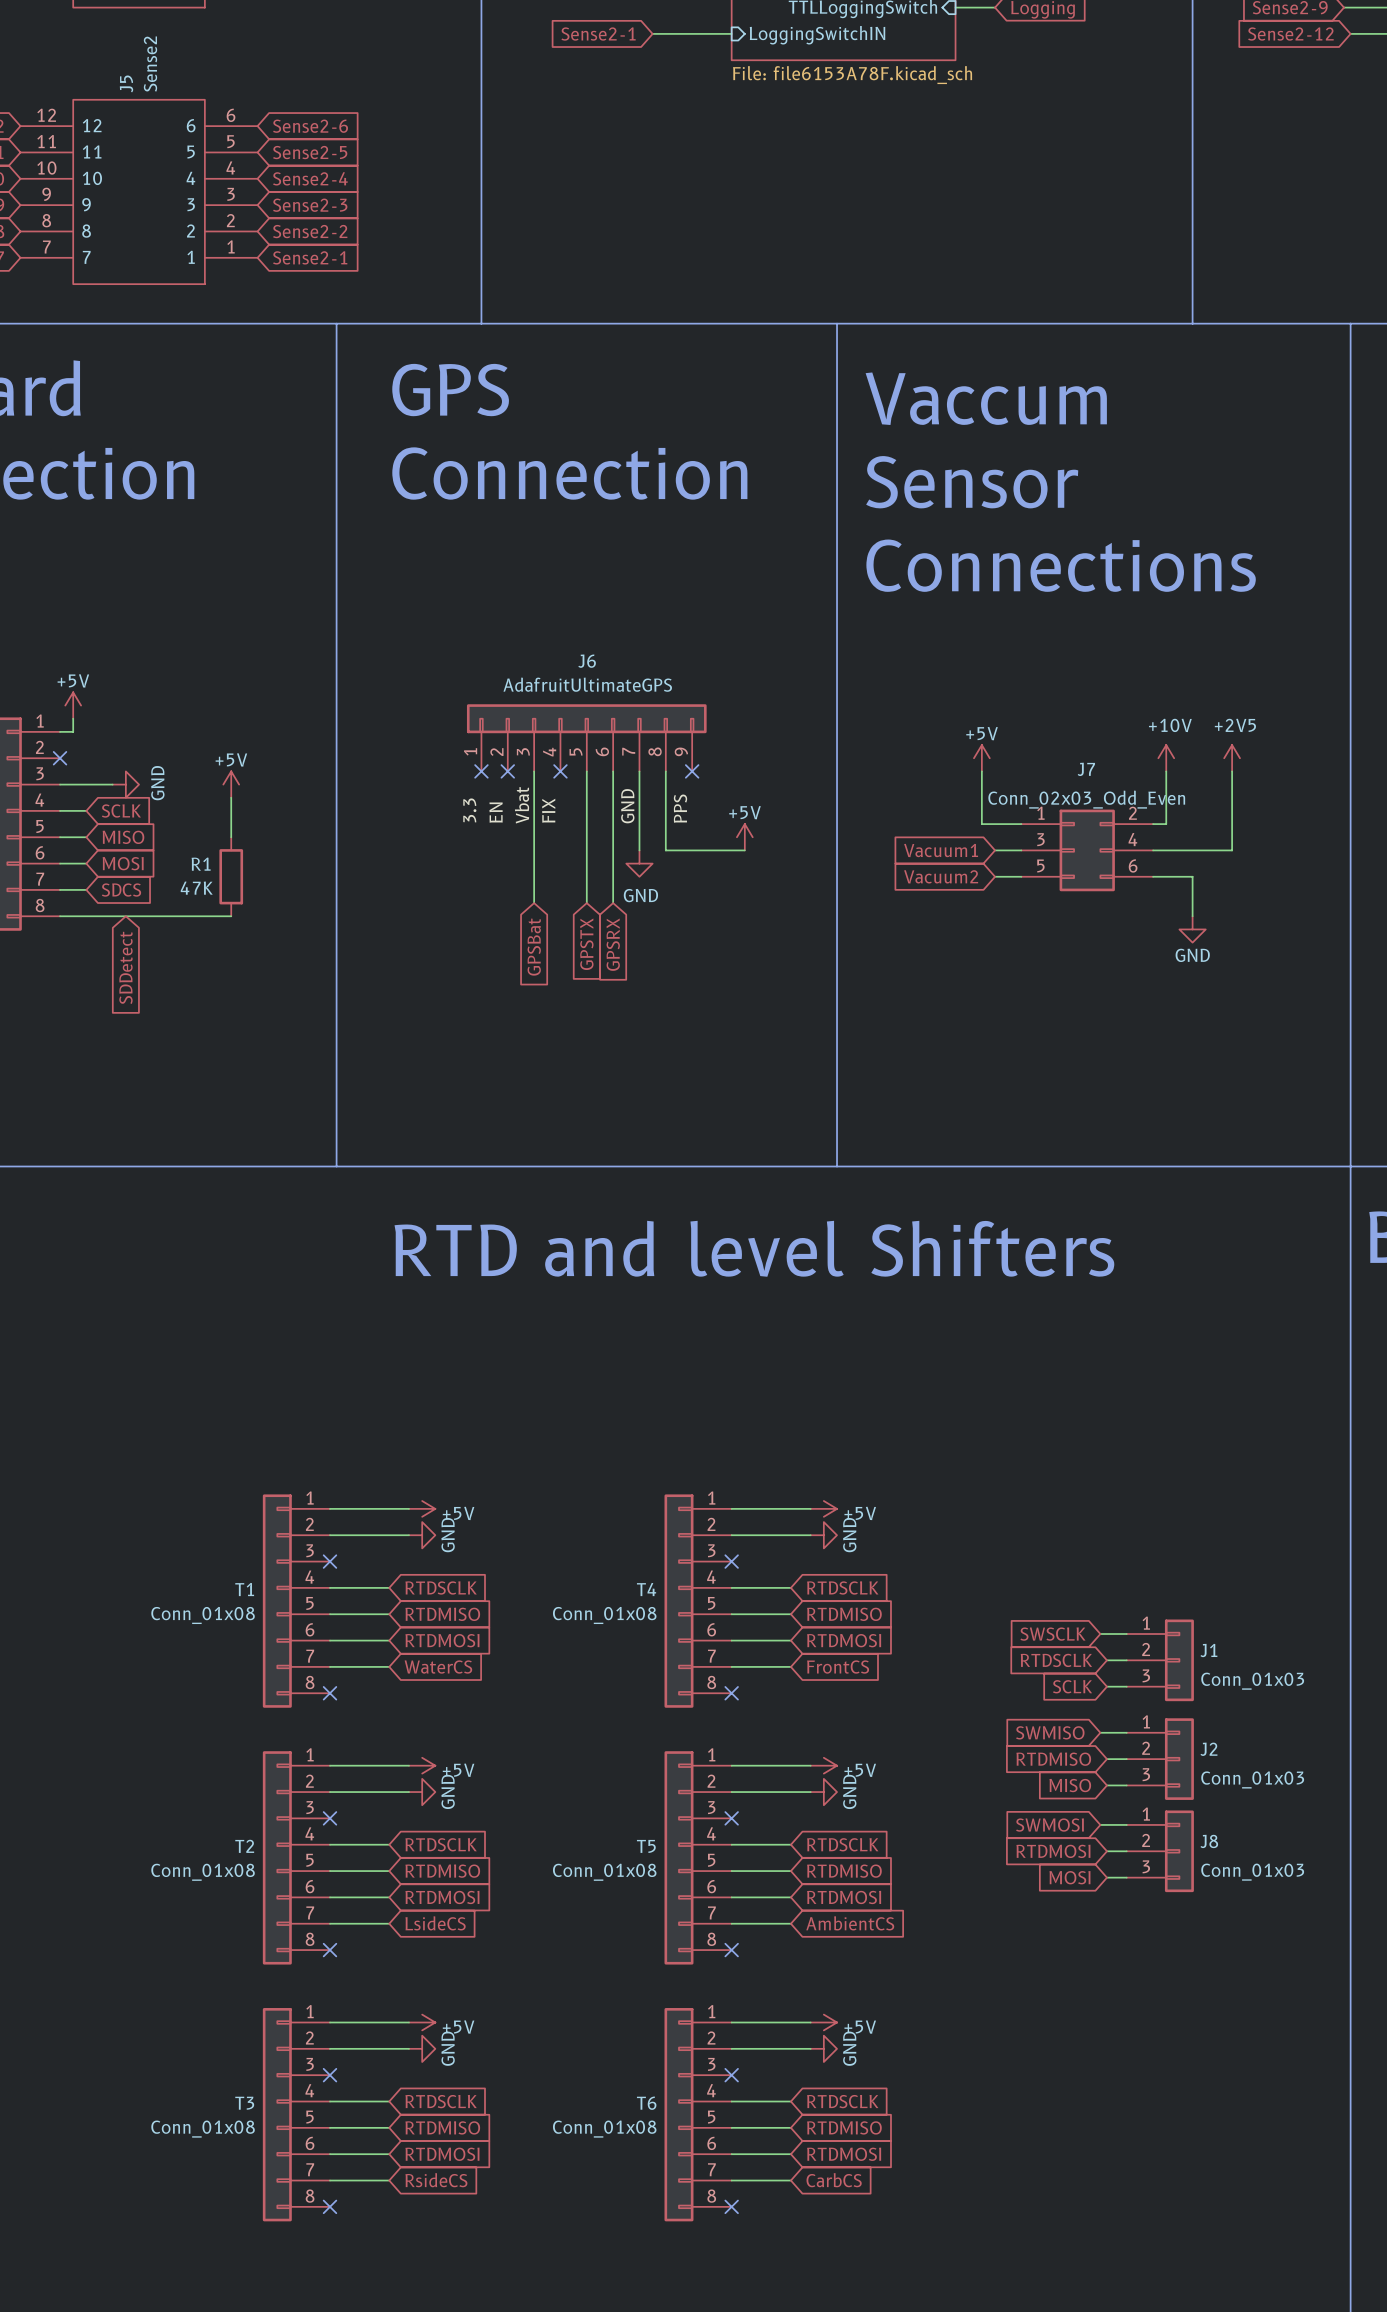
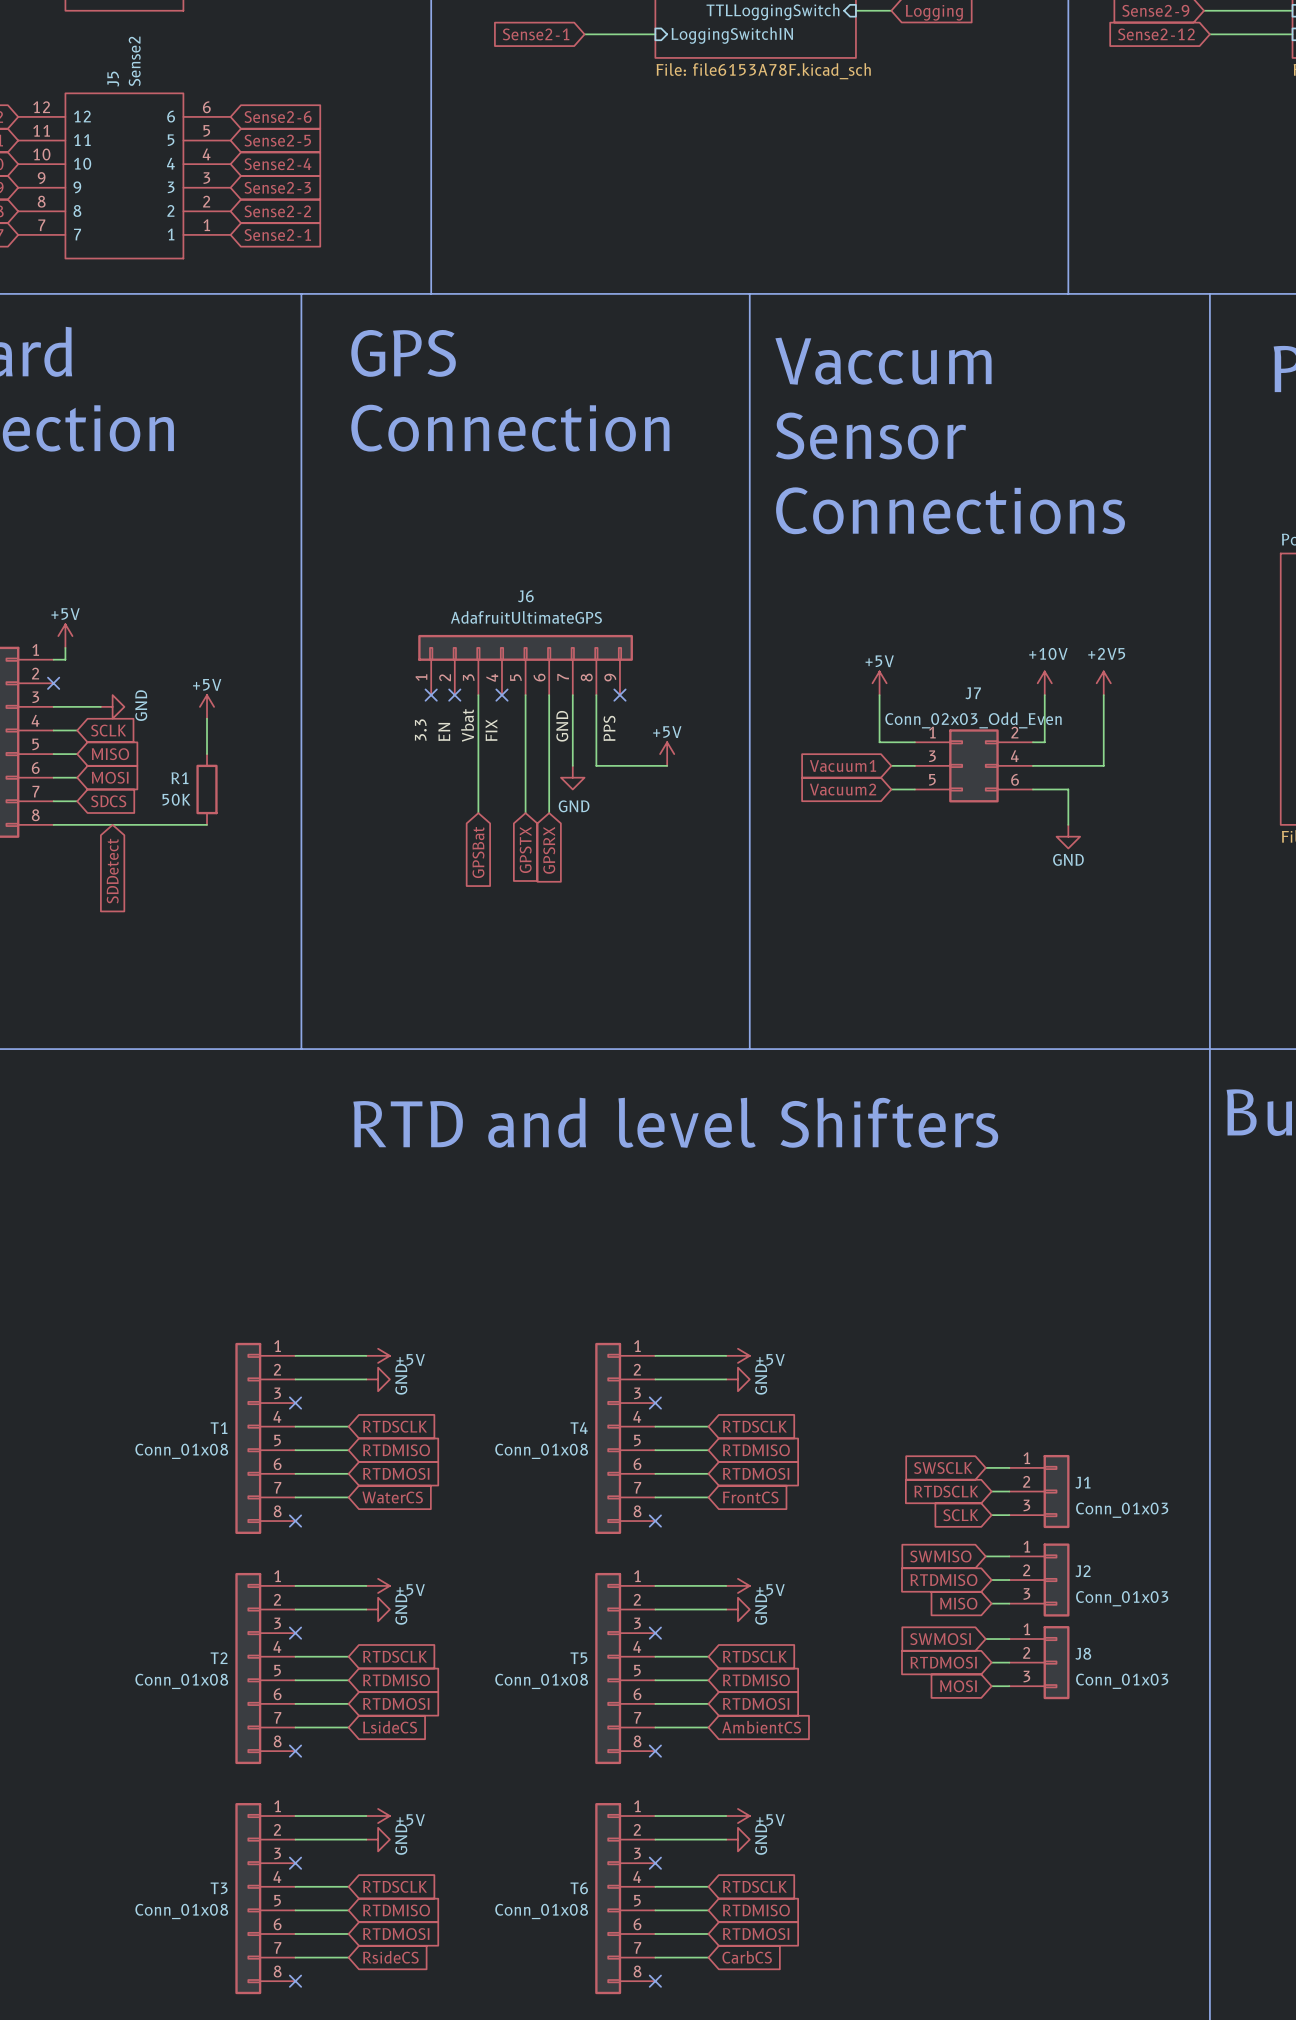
R1 value: 47K (196, 888) -> 50K (176, 799)

